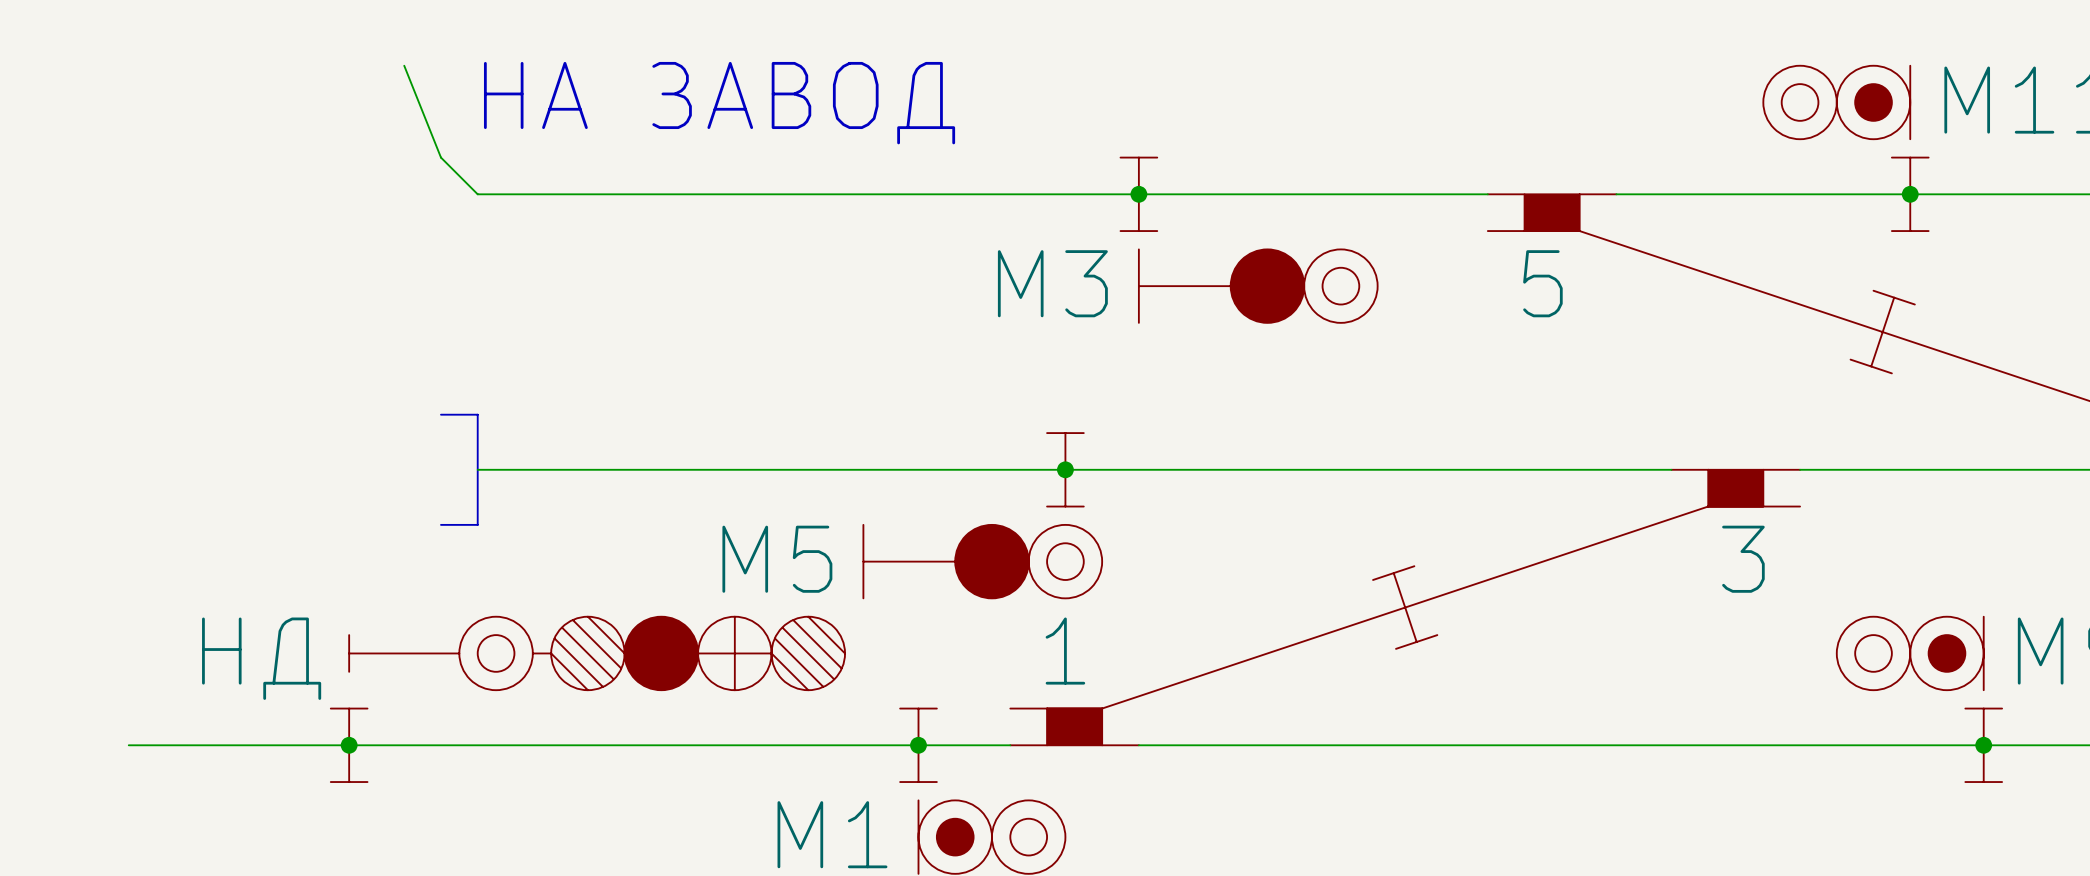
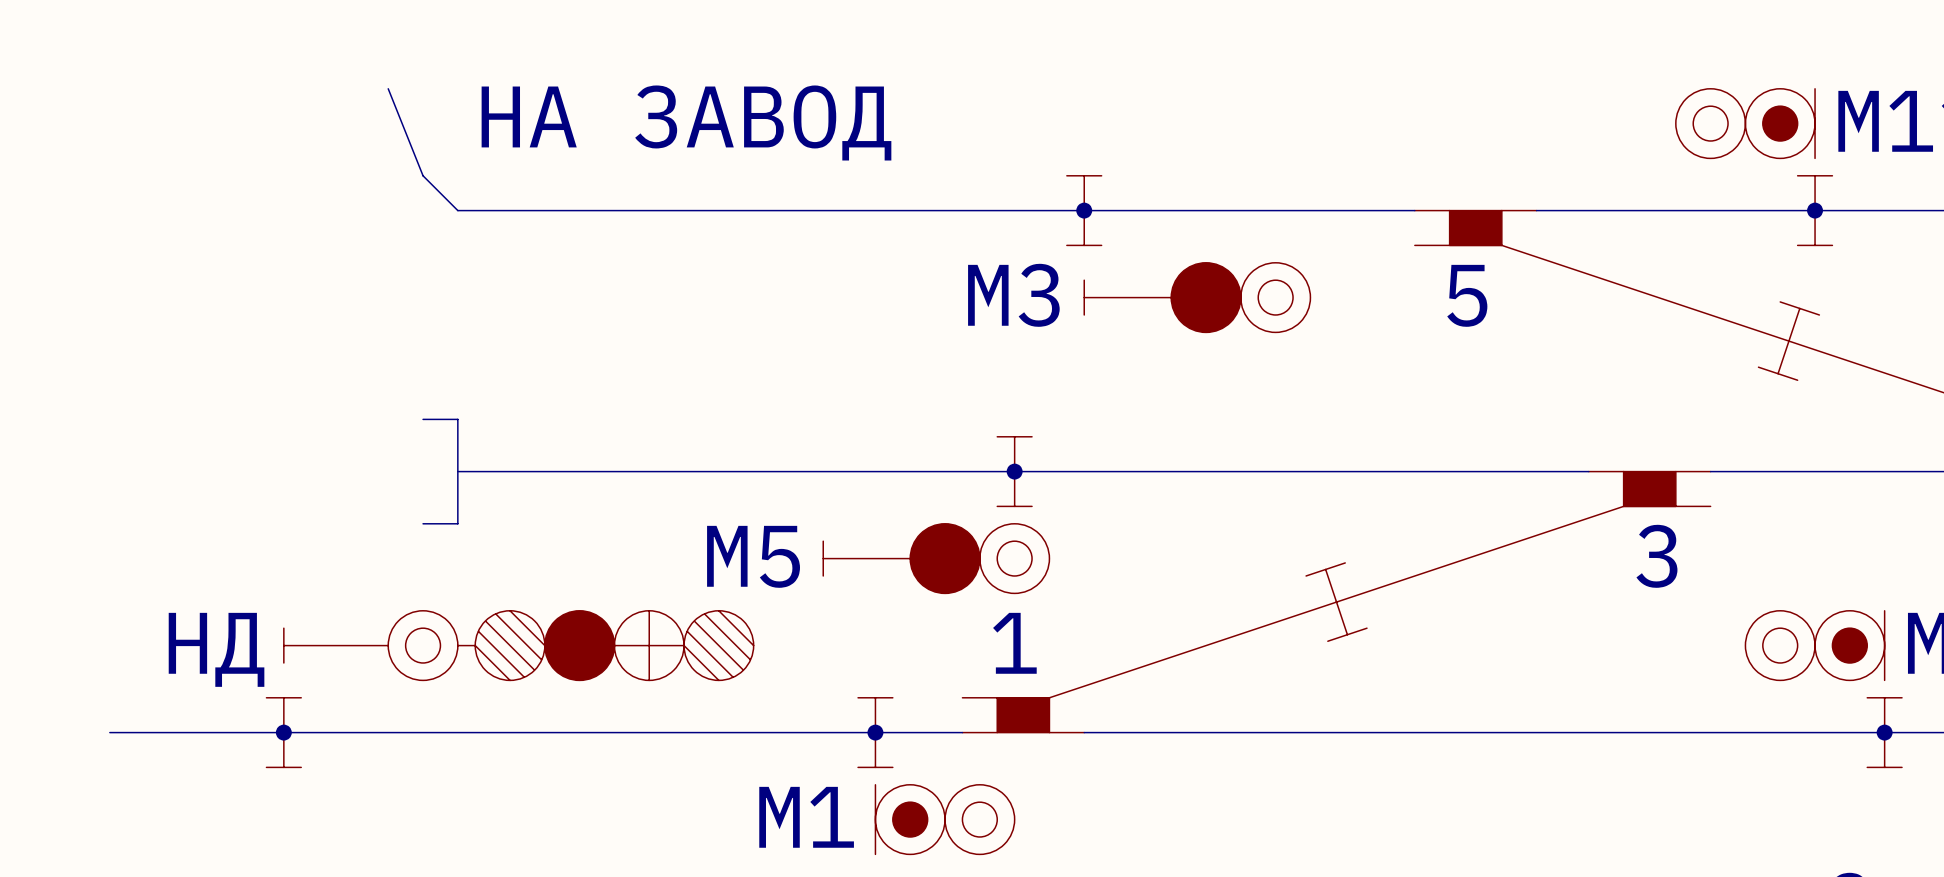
part symbol: [1138, 249, 1378, 323] -> [1084, 262, 1311, 333]
part symbol: [863, 524, 1103, 599] -> [823, 523, 1050, 594]
part position: (597, 653) -> (518, 645)
wire: none -> (109, 732) (127, 732)
junction position: (349, 745) -> (283, 732)
part position: (349, 745) -> (283, 732)

